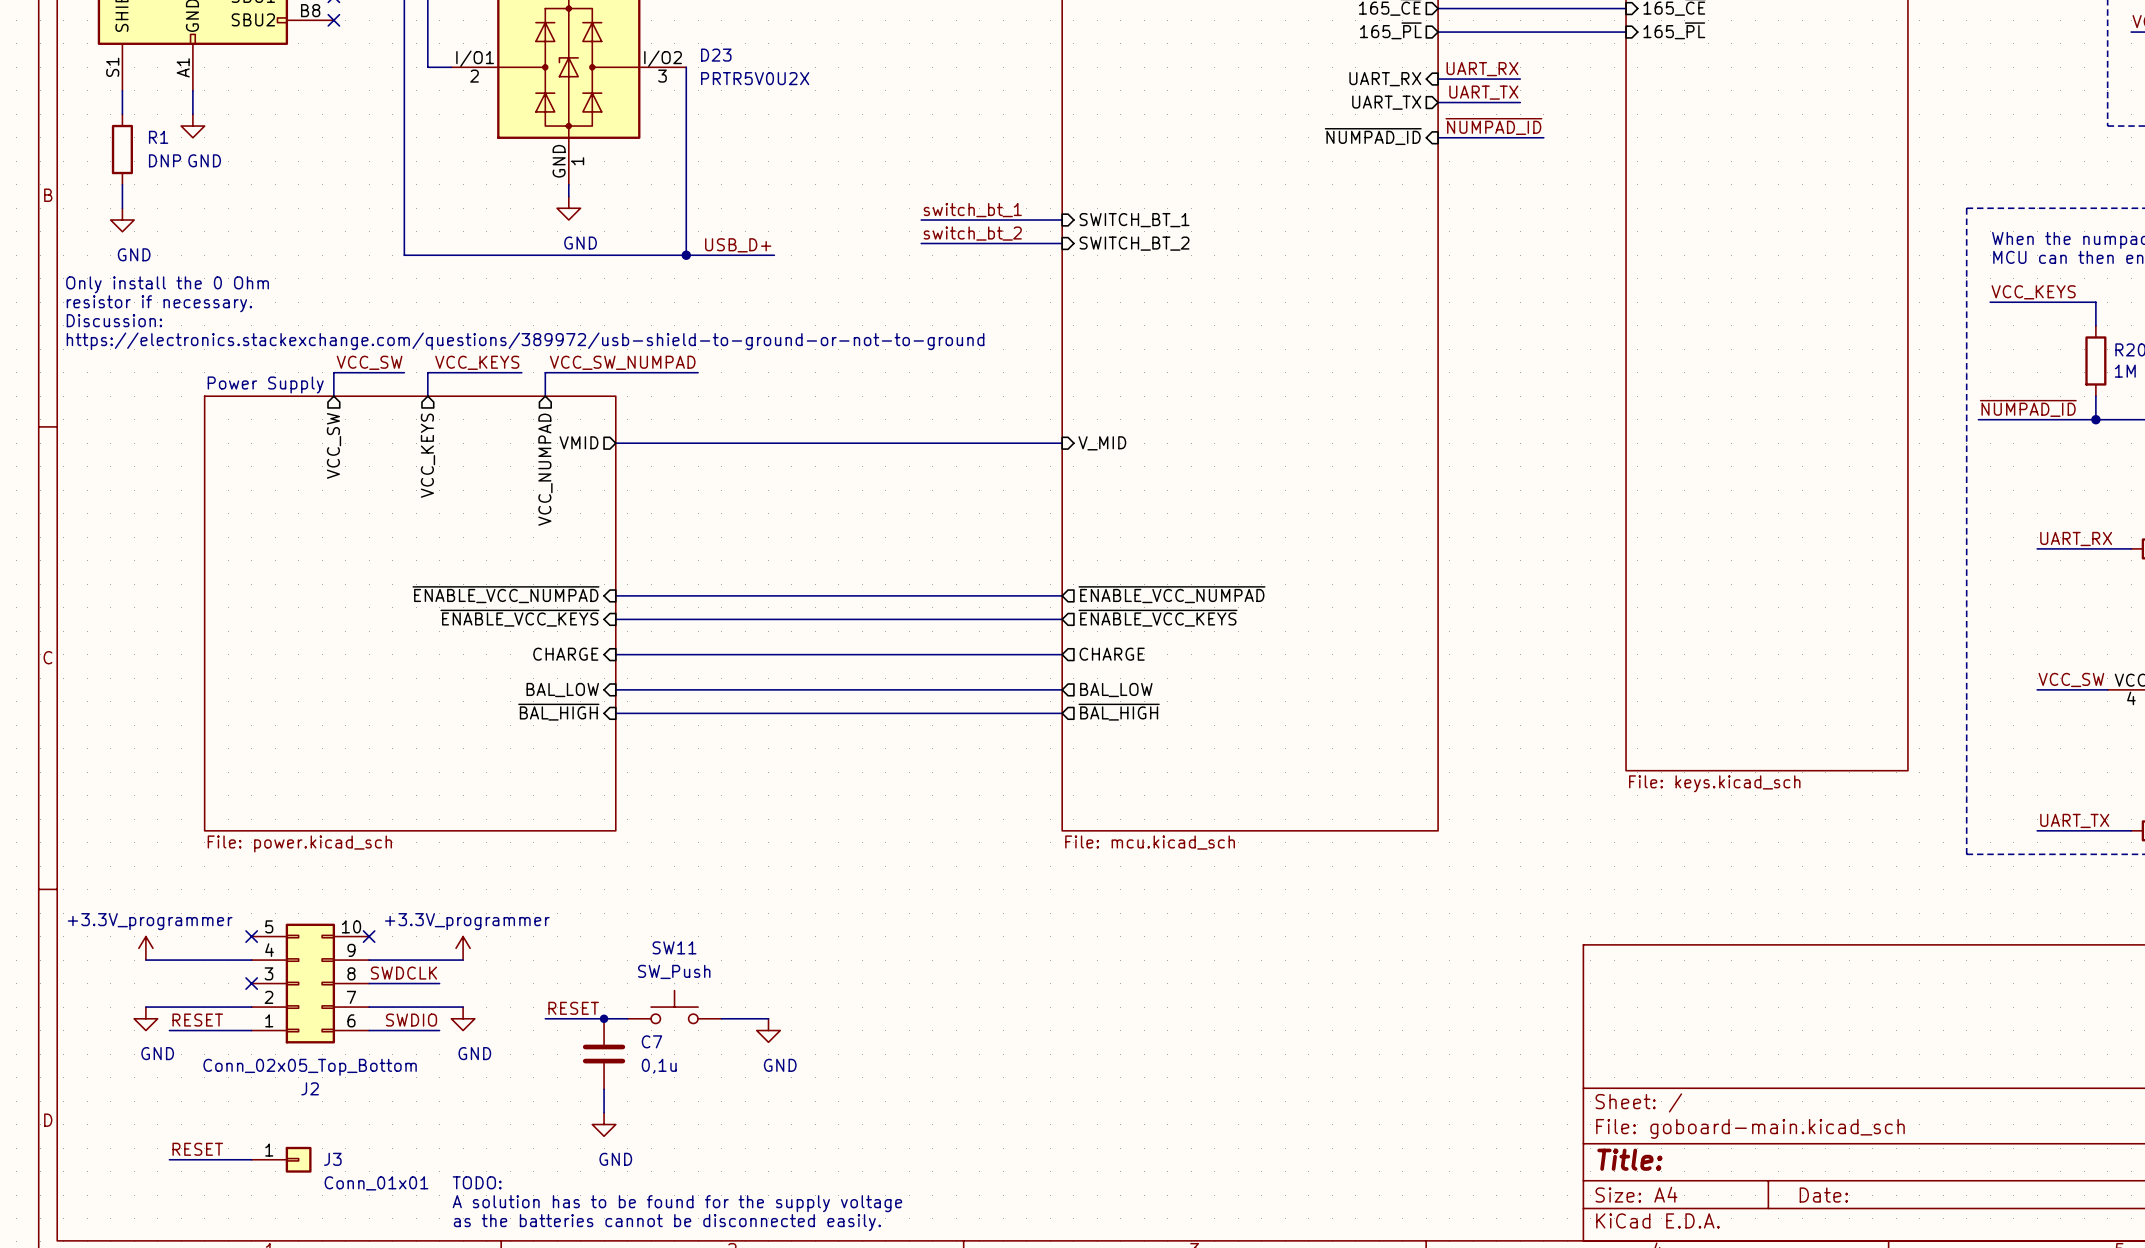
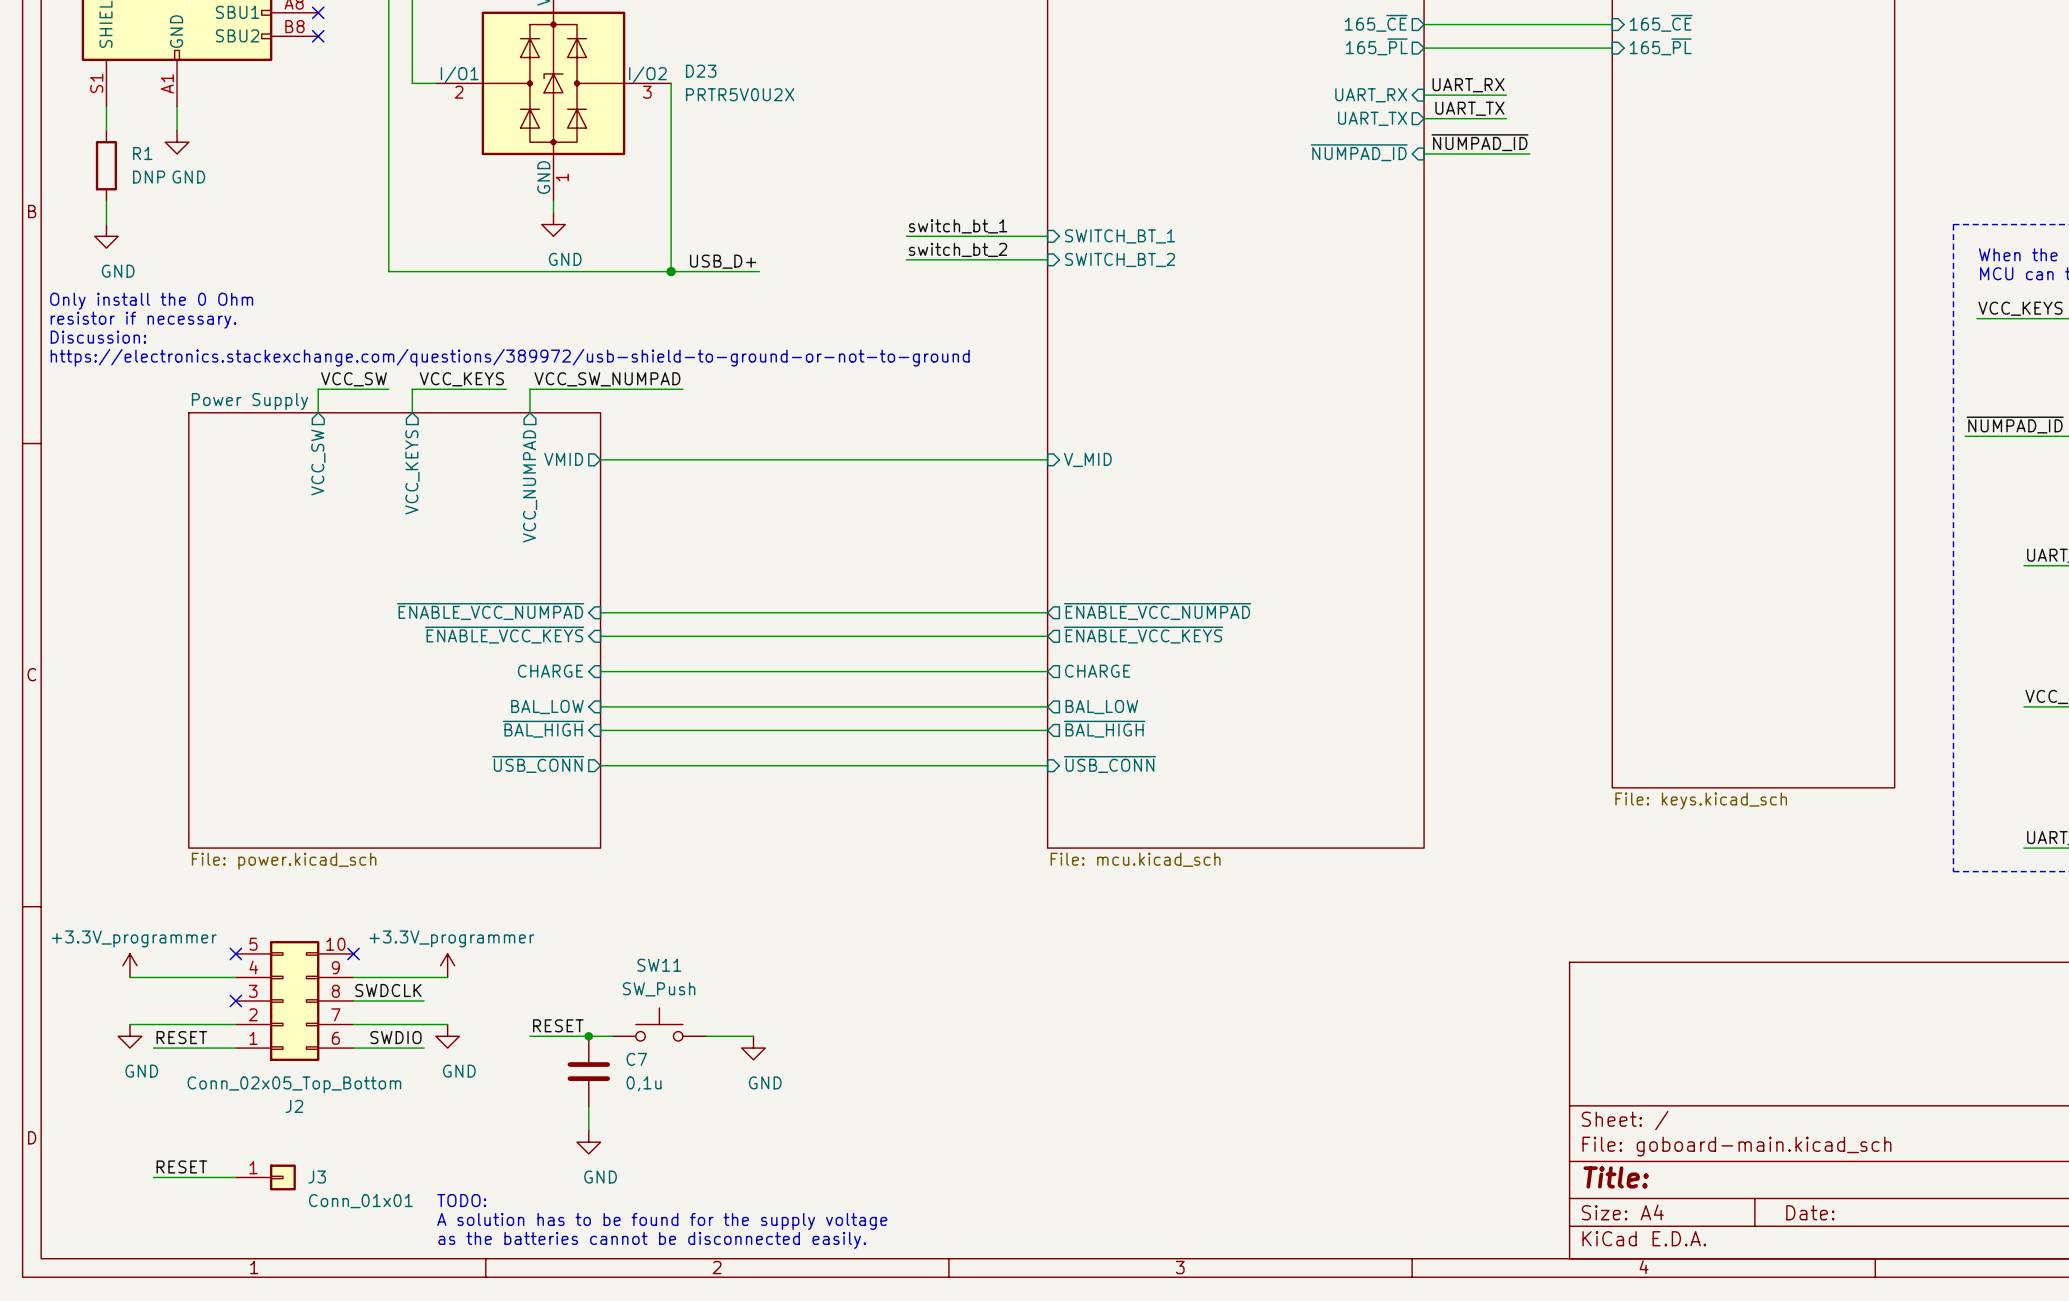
sheet pin: none -> ~{USB_CONN} (538, 764)
sheet pin: none -> ~{USB_CONN} (1109, 764)
wire: none -> (600, 765) (1047, 765)

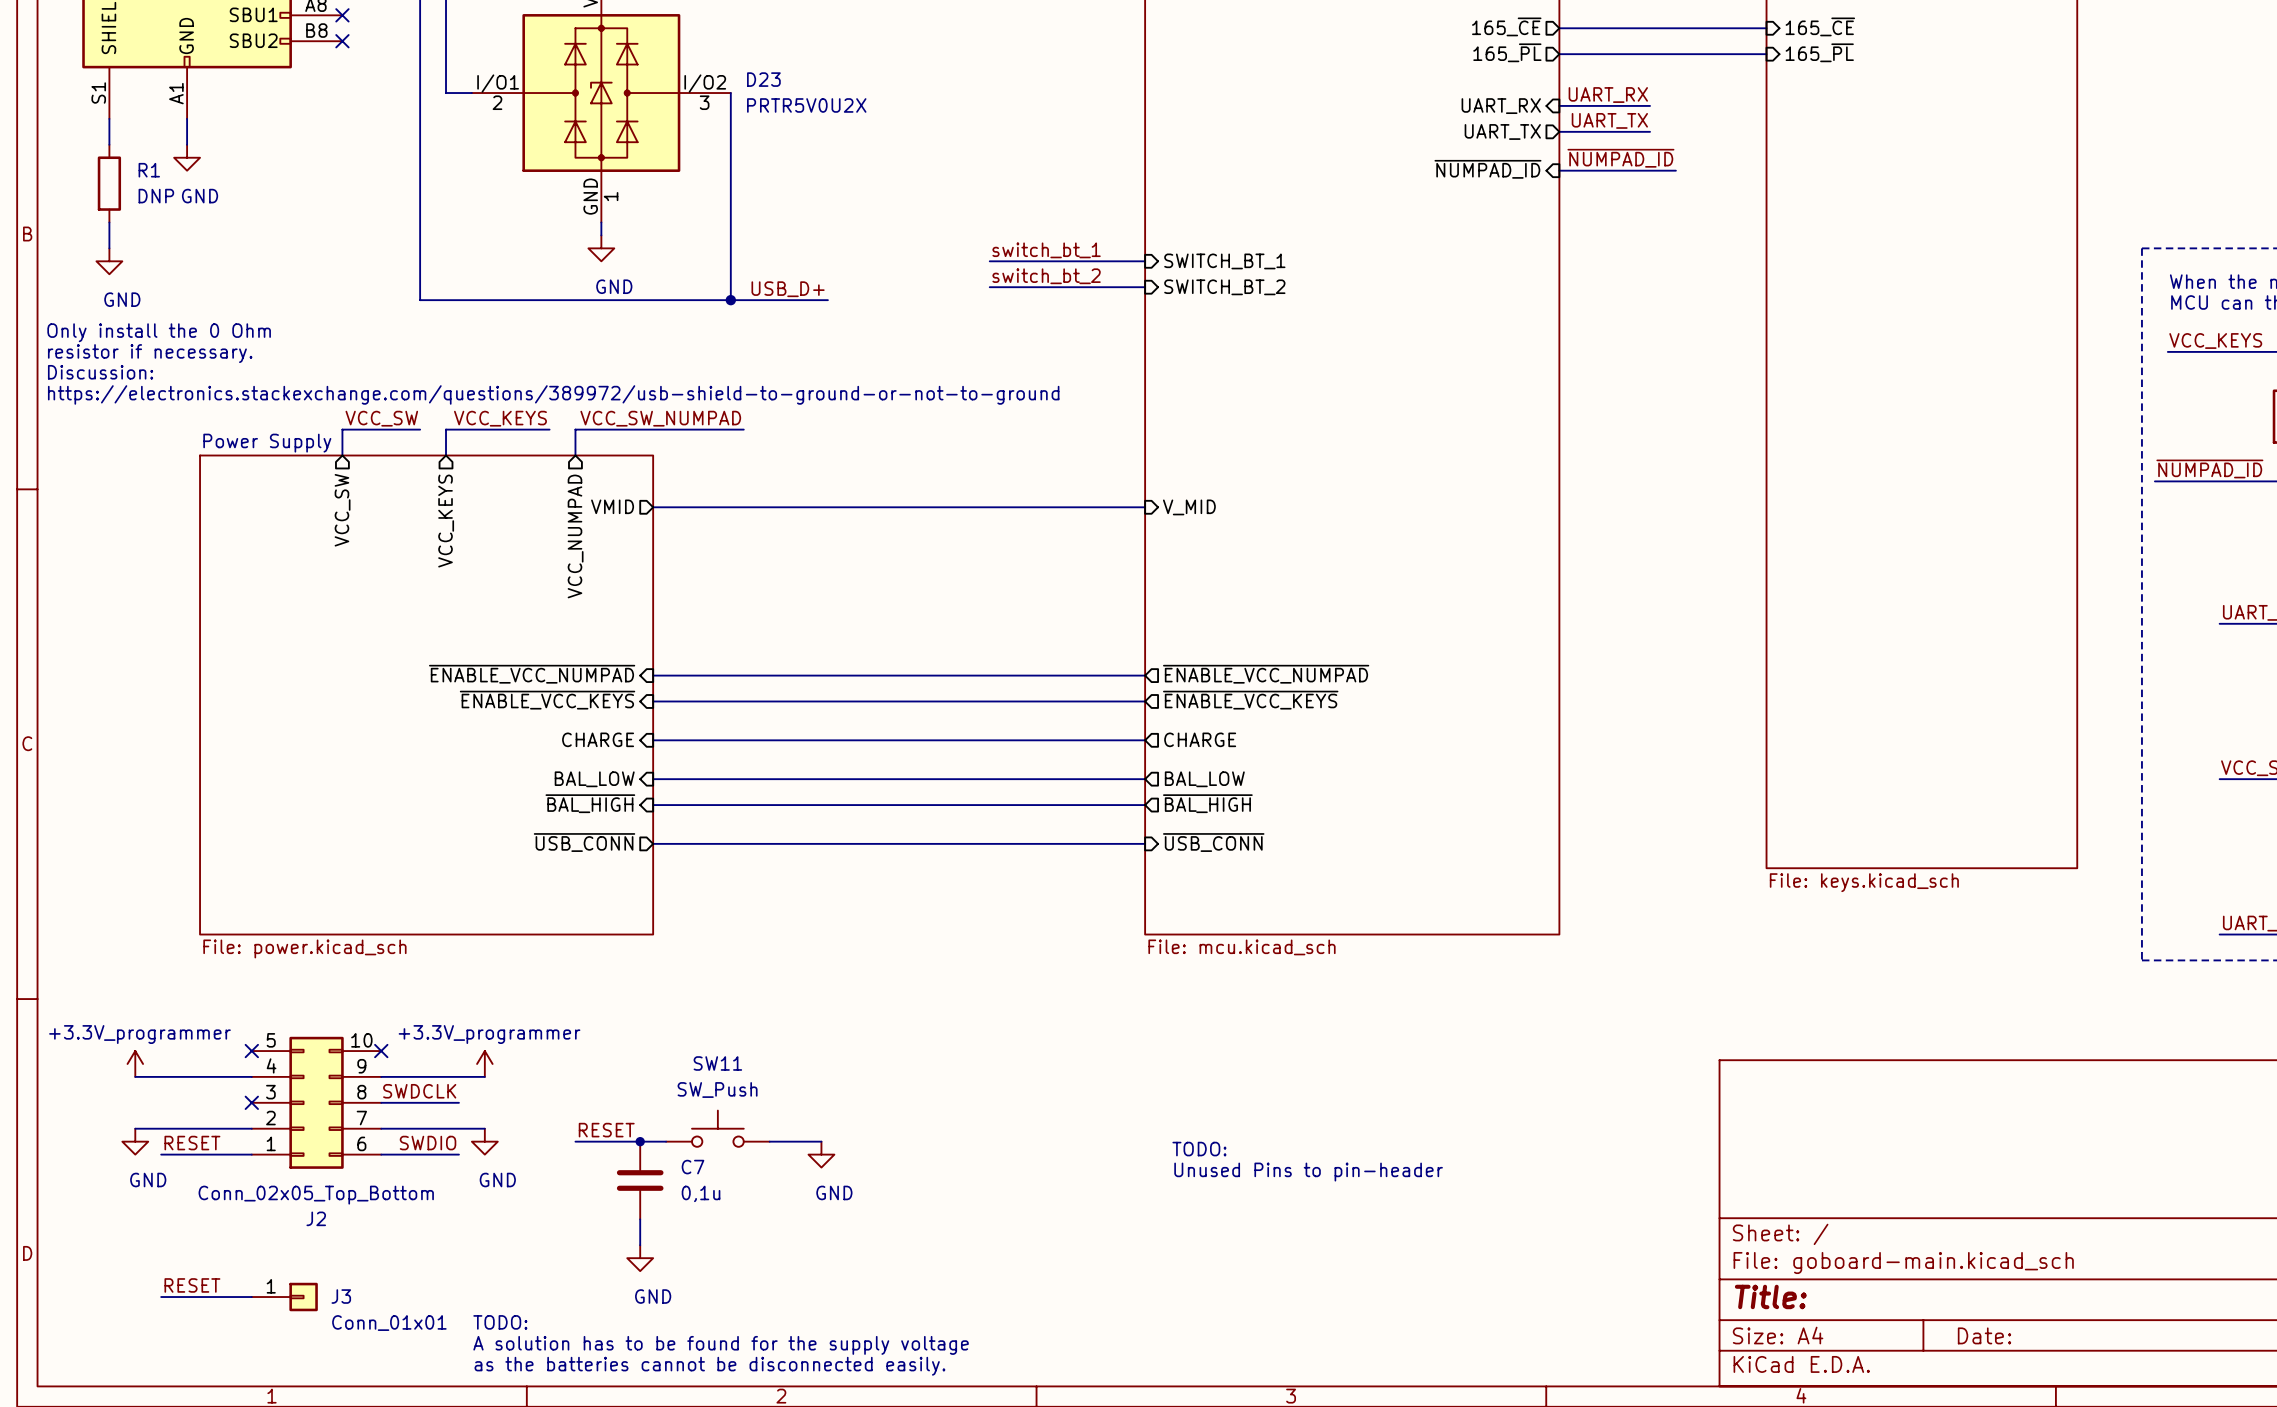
text: none -> TODO: (1199, 1149)
text: none -> Unused Pins to pin-header (1308, 1172)

